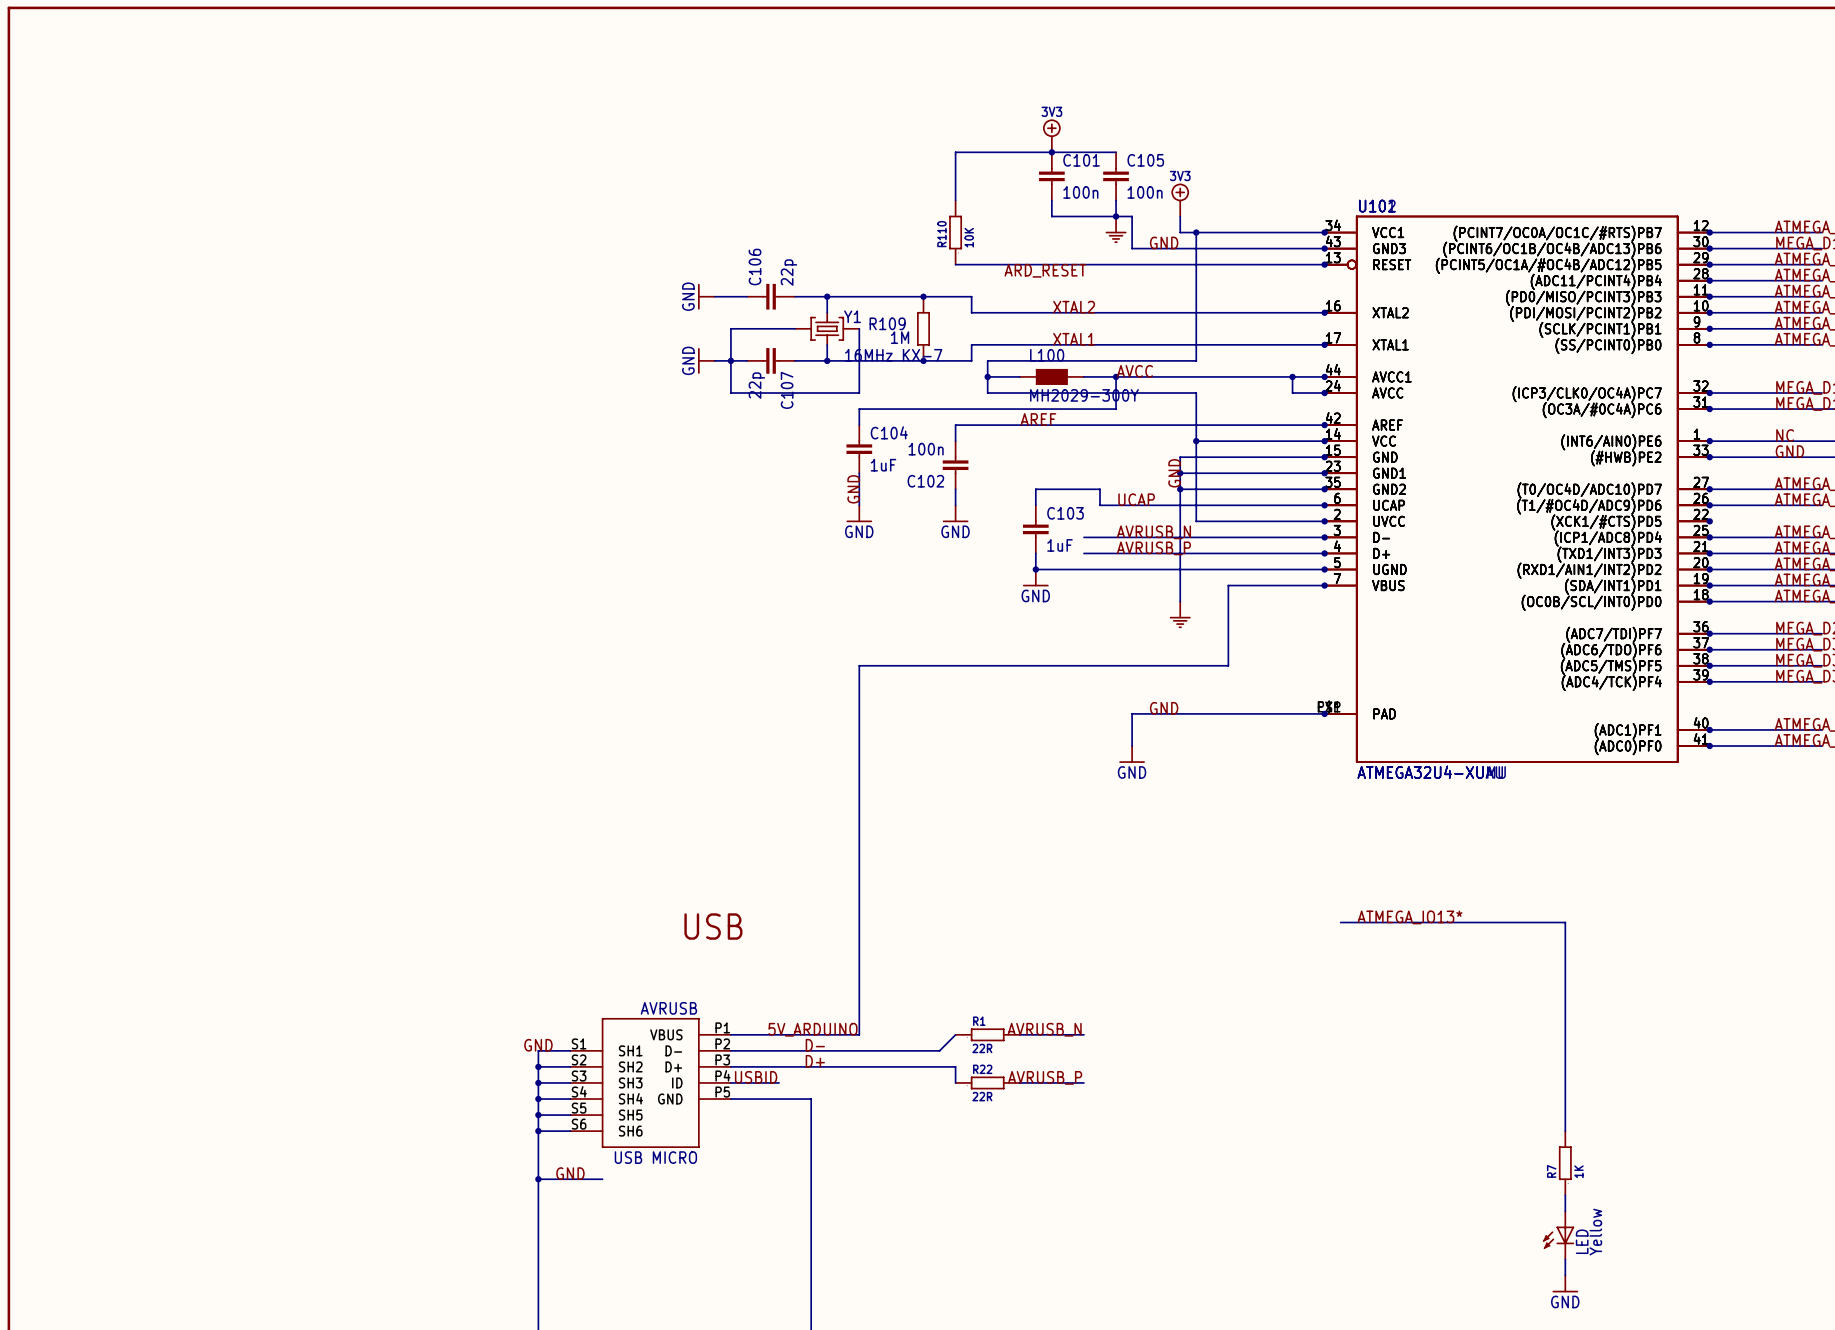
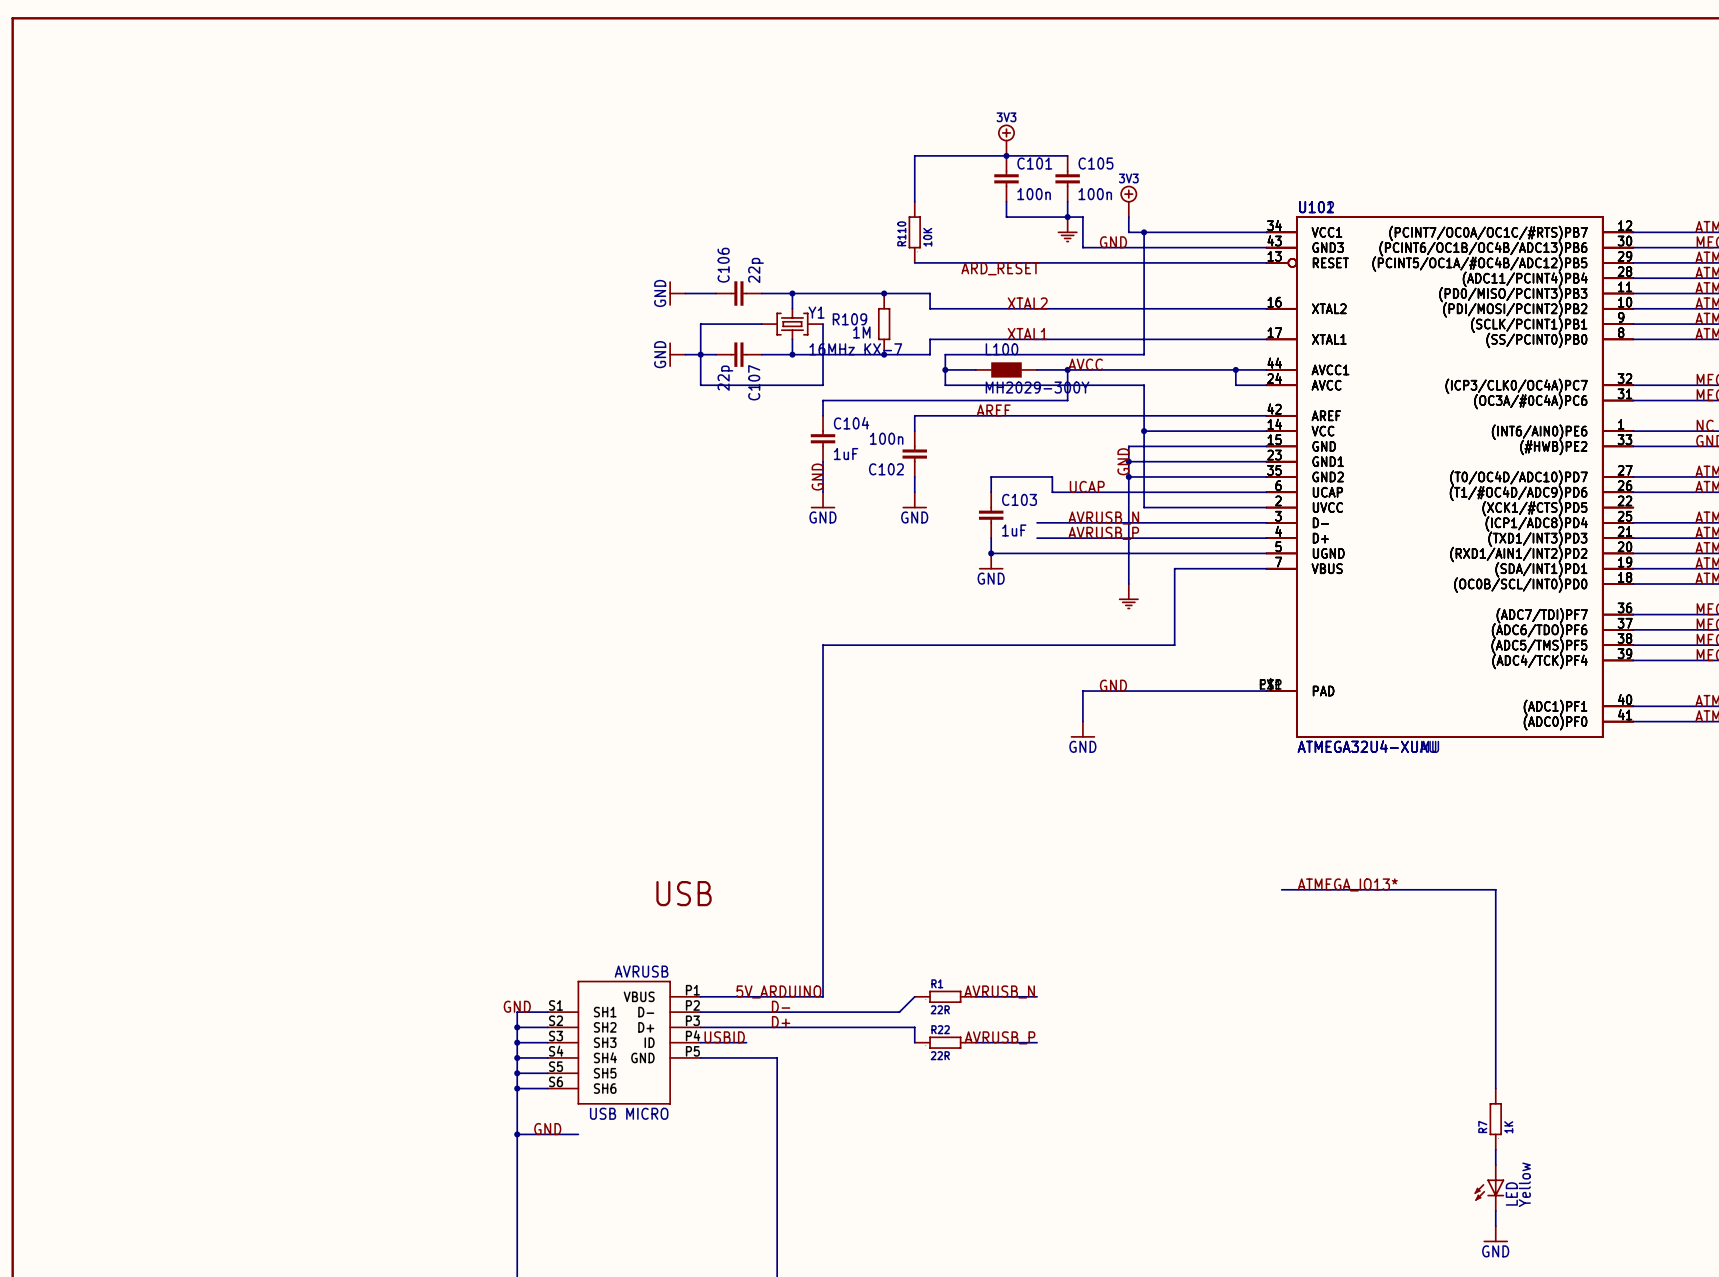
junction: (1324, 232) -> none
junction: (1709, 232) -> none
junction: (1324, 248) -> none
junction: (1709, 248) -> none
junction: (1324, 264) -> none
junction: (1709, 264) -> none
junction: (1709, 280) -> none
junction: (1709, 296) -> none
junction: (1324, 312) -> none
junction: (1709, 312) -> none
junction: (1709, 328) -> none
junction: (1324, 344) -> none
junction: (1709, 344) -> none
junction: (1324, 376) -> none
junction: (1324, 393) -> none
junction: (1709, 393) -> none
junction: (1709, 409) -> none
junction: (1324, 425) -> none
junction: (1324, 441) -> none
junction: (1709, 441) -> none
junction: (1324, 457) -> none
junction: (1709, 457) -> none
junction: (1324, 473) -> none
junction: (1324, 489) -> none
junction: (1709, 489) -> none
junction: (1324, 505) -> none
junction: (1709, 505) -> none
junction: (1324, 521) -> none
junction: (1709, 521) -> none
junction: (1324, 537) -> none
junction: (1709, 537) -> none
junction: (1324, 553) -> none
junction: (1709, 553) -> none
junction: (1324, 569) -> none
junction: (1709, 569) -> none
junction: (1324, 585) -> none
junction: (1709, 585) -> none
junction: (1709, 601) -> none
junction: (1709, 633) -> none
junction: (1709, 649) -> none
junction: (1709, 665) -> none
junction: (1709, 681) -> none
junction: (1324, 713) -> none
junction: (1709, 729) -> none
junction: (1709, 746) -> none

